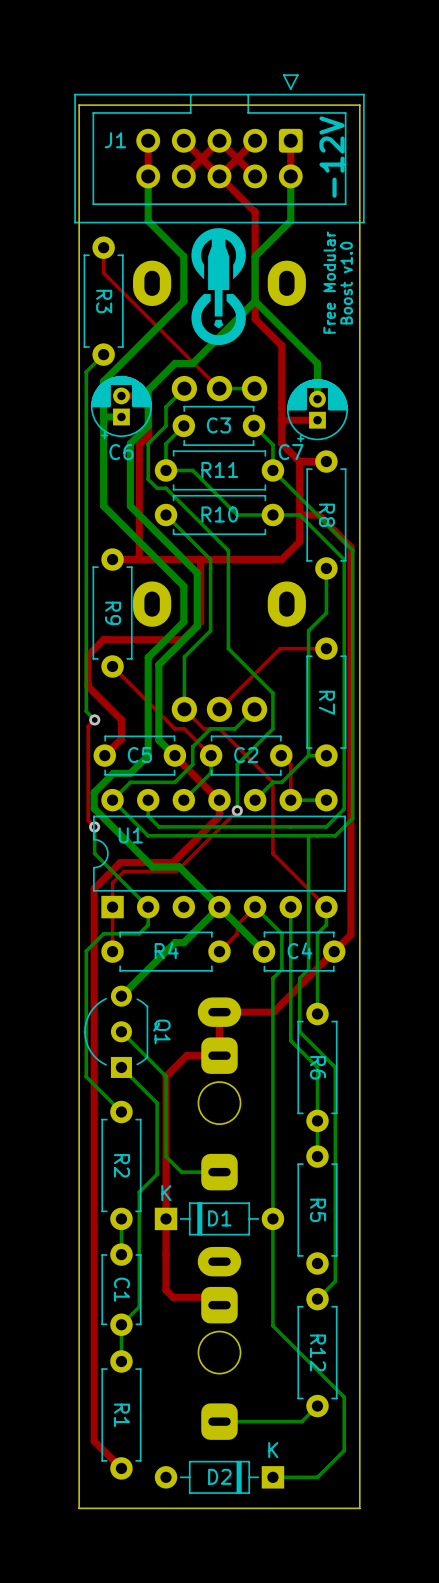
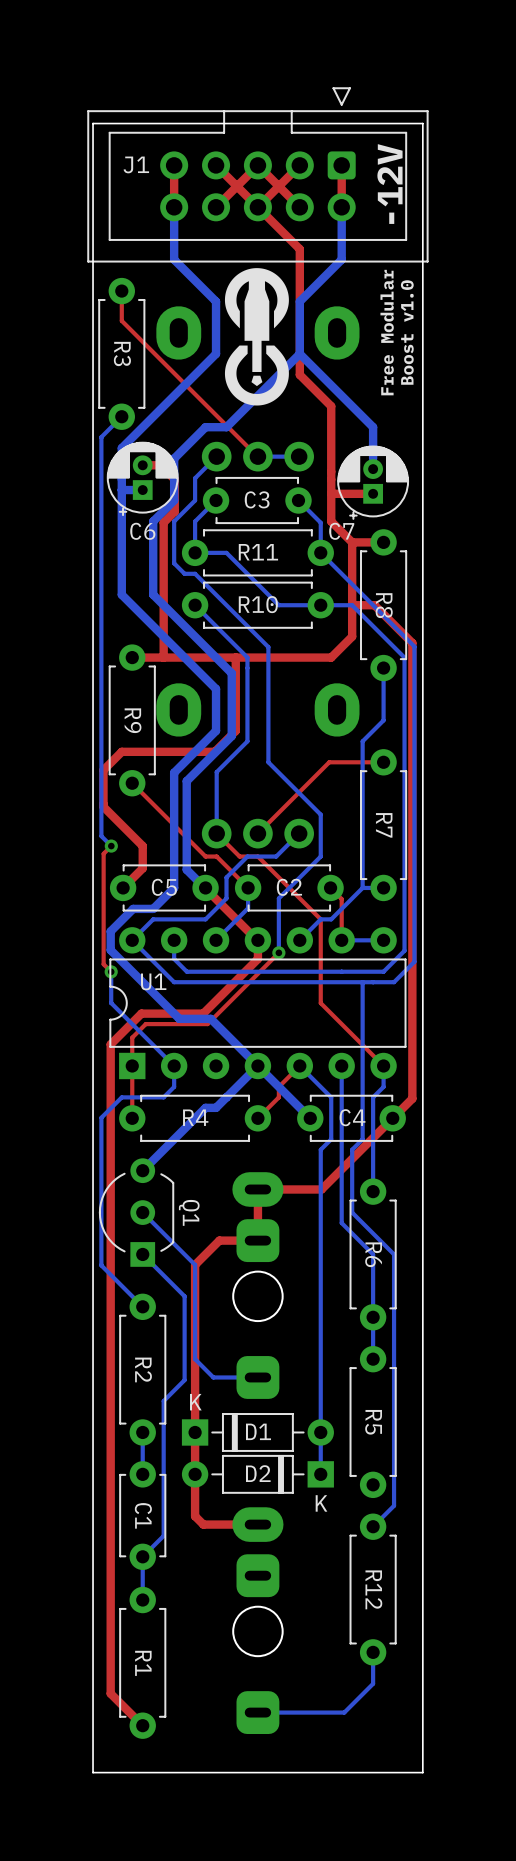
bottom track: (272, 1254) (272, 1325) (344, 1397) (344, 1450) (317, 1477) (272, 1477) -> none
part position: (219, 1343) -> (257, 1620)
bottom track: (317, 1406) (301, 1421) (219, 1421) -> (373, 1652) (373, 1683) (344, 1712) (257, 1712)
D2 text position: K (273, 1450) -> K (321, 1503)
D2 position: (219, 1477) -> (257, 1474)

